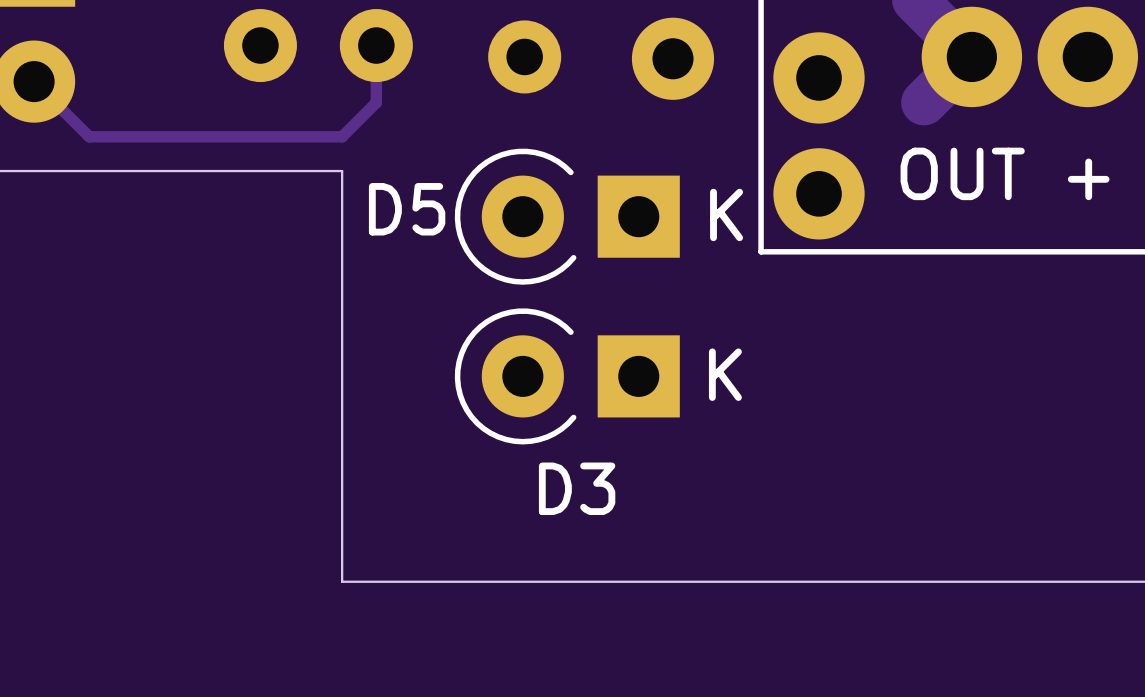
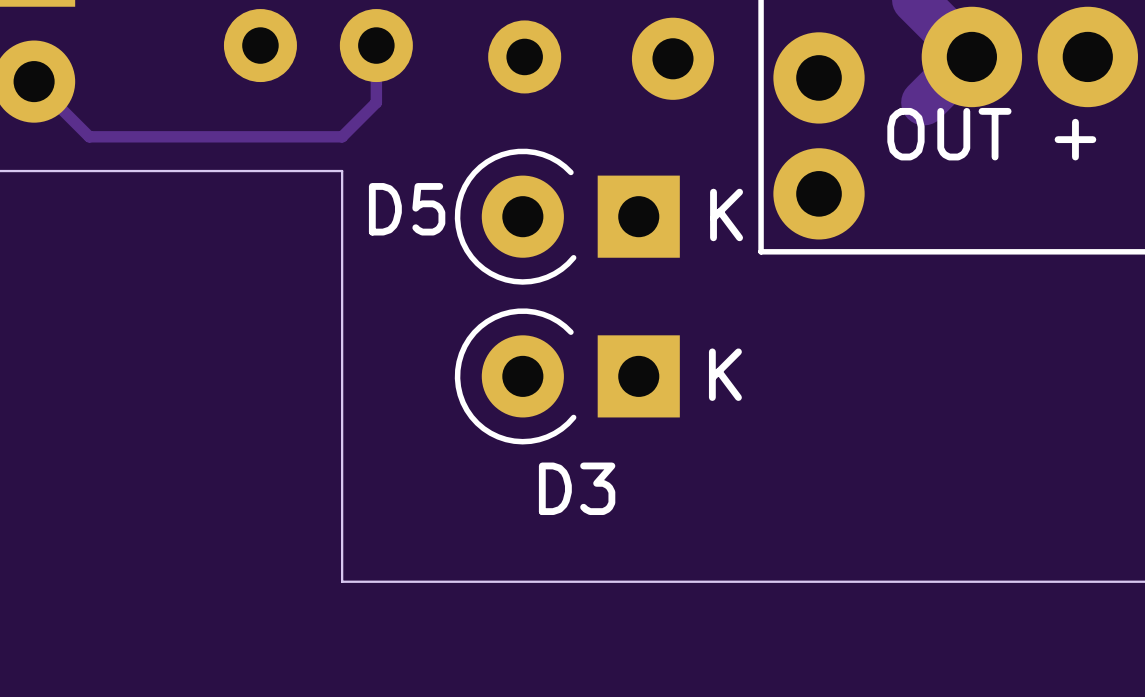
part text position: OUT + (1005, 173) -> OUT + (991, 134)

